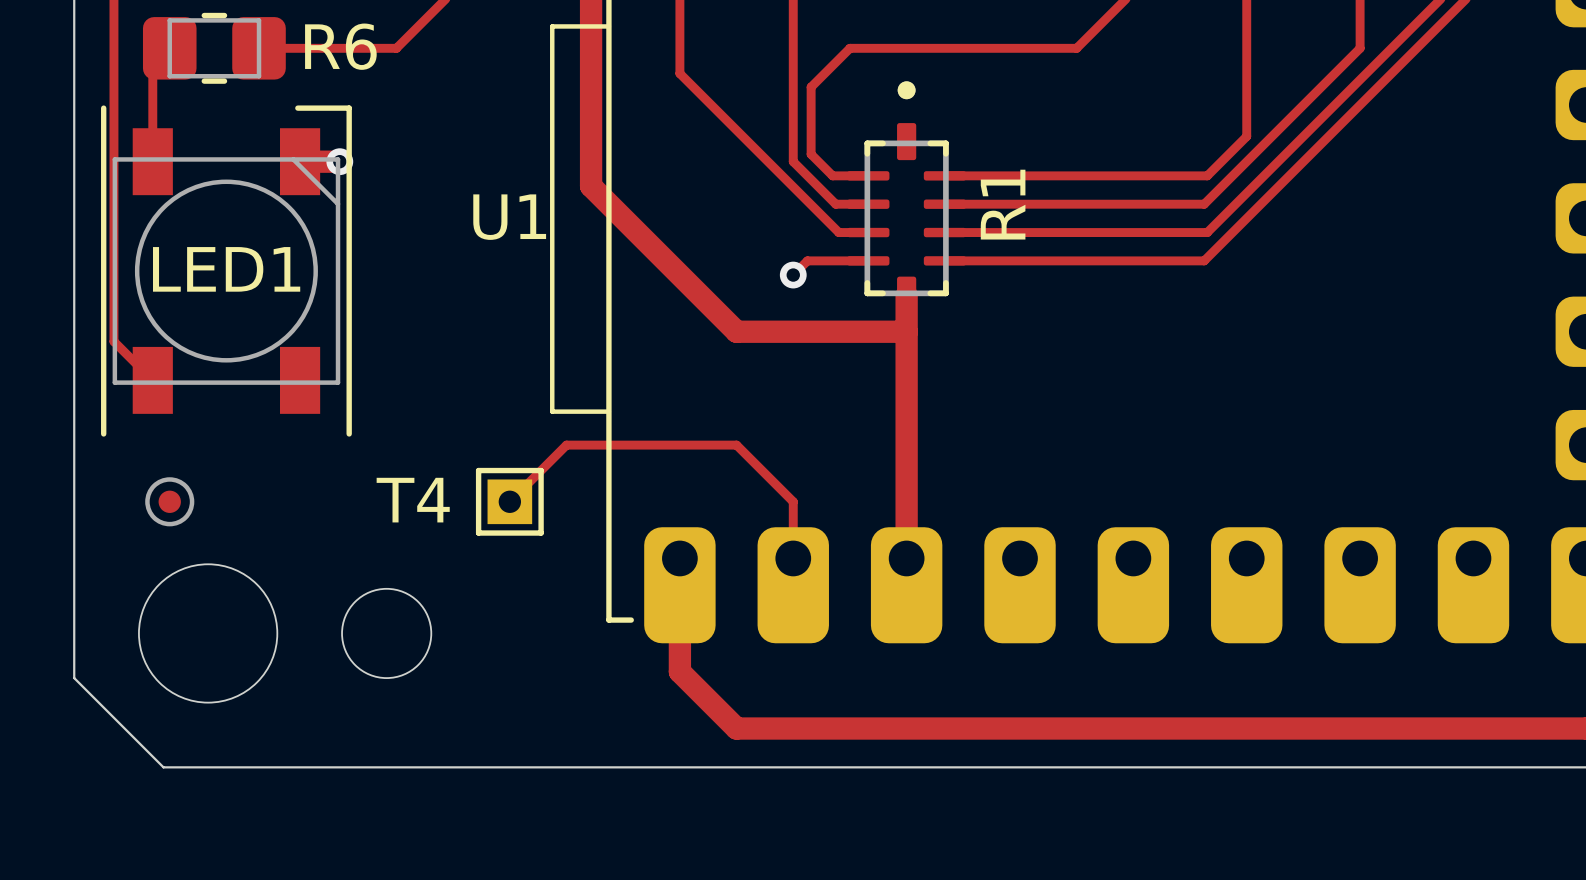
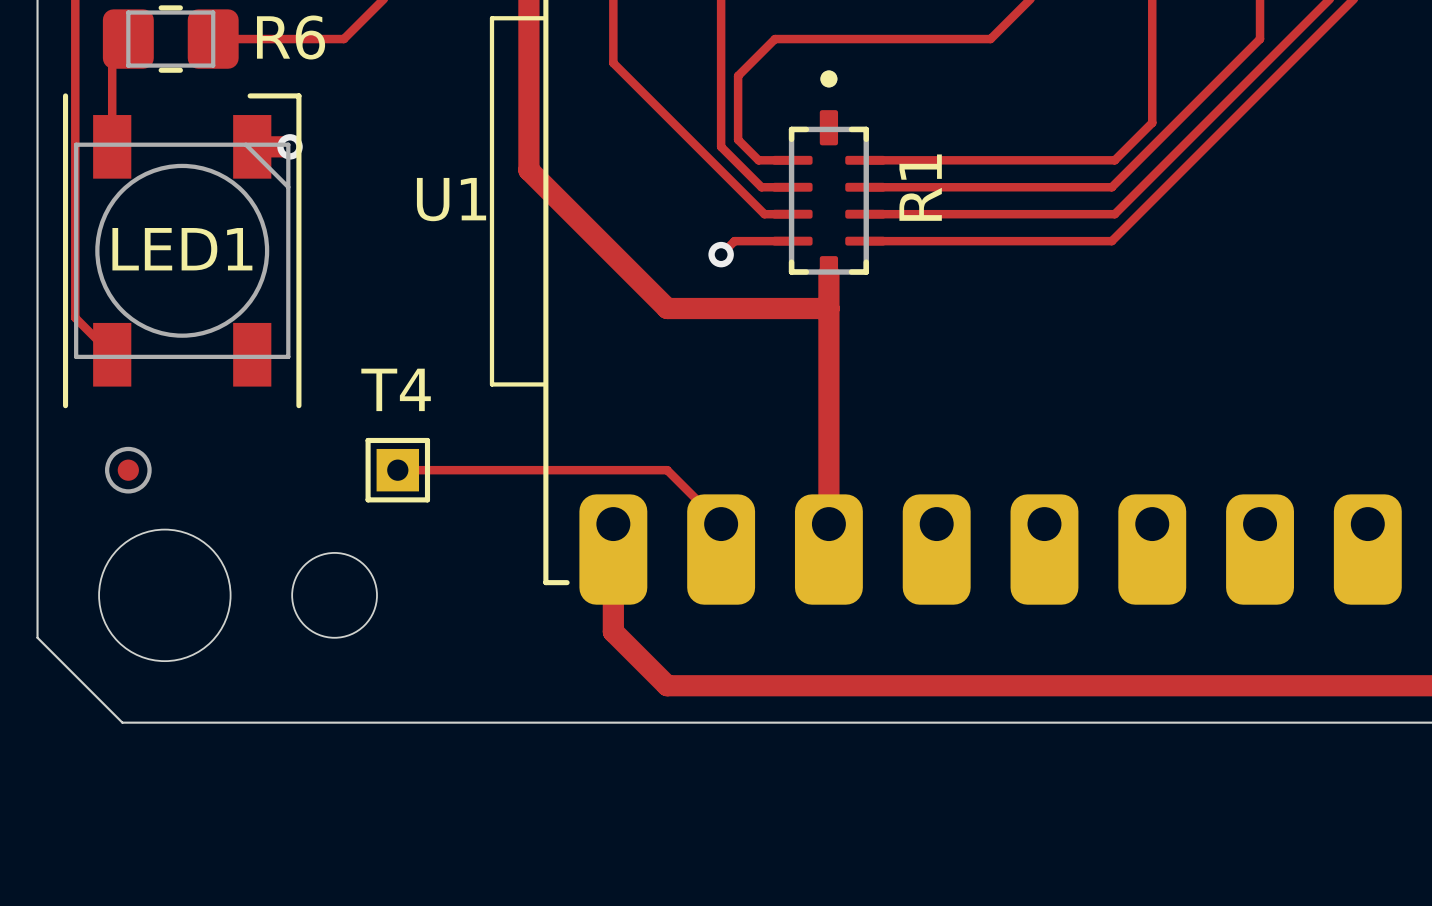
T4 name position: T4 (413, 500) -> T4 (396, 389)
track: (509, 501) (566, 445) (736, 445) (793, 501) (793, 558) -> (397, 470) (667, 470) (721, 524)
T4 position: (509, 501) -> (397, 470)

